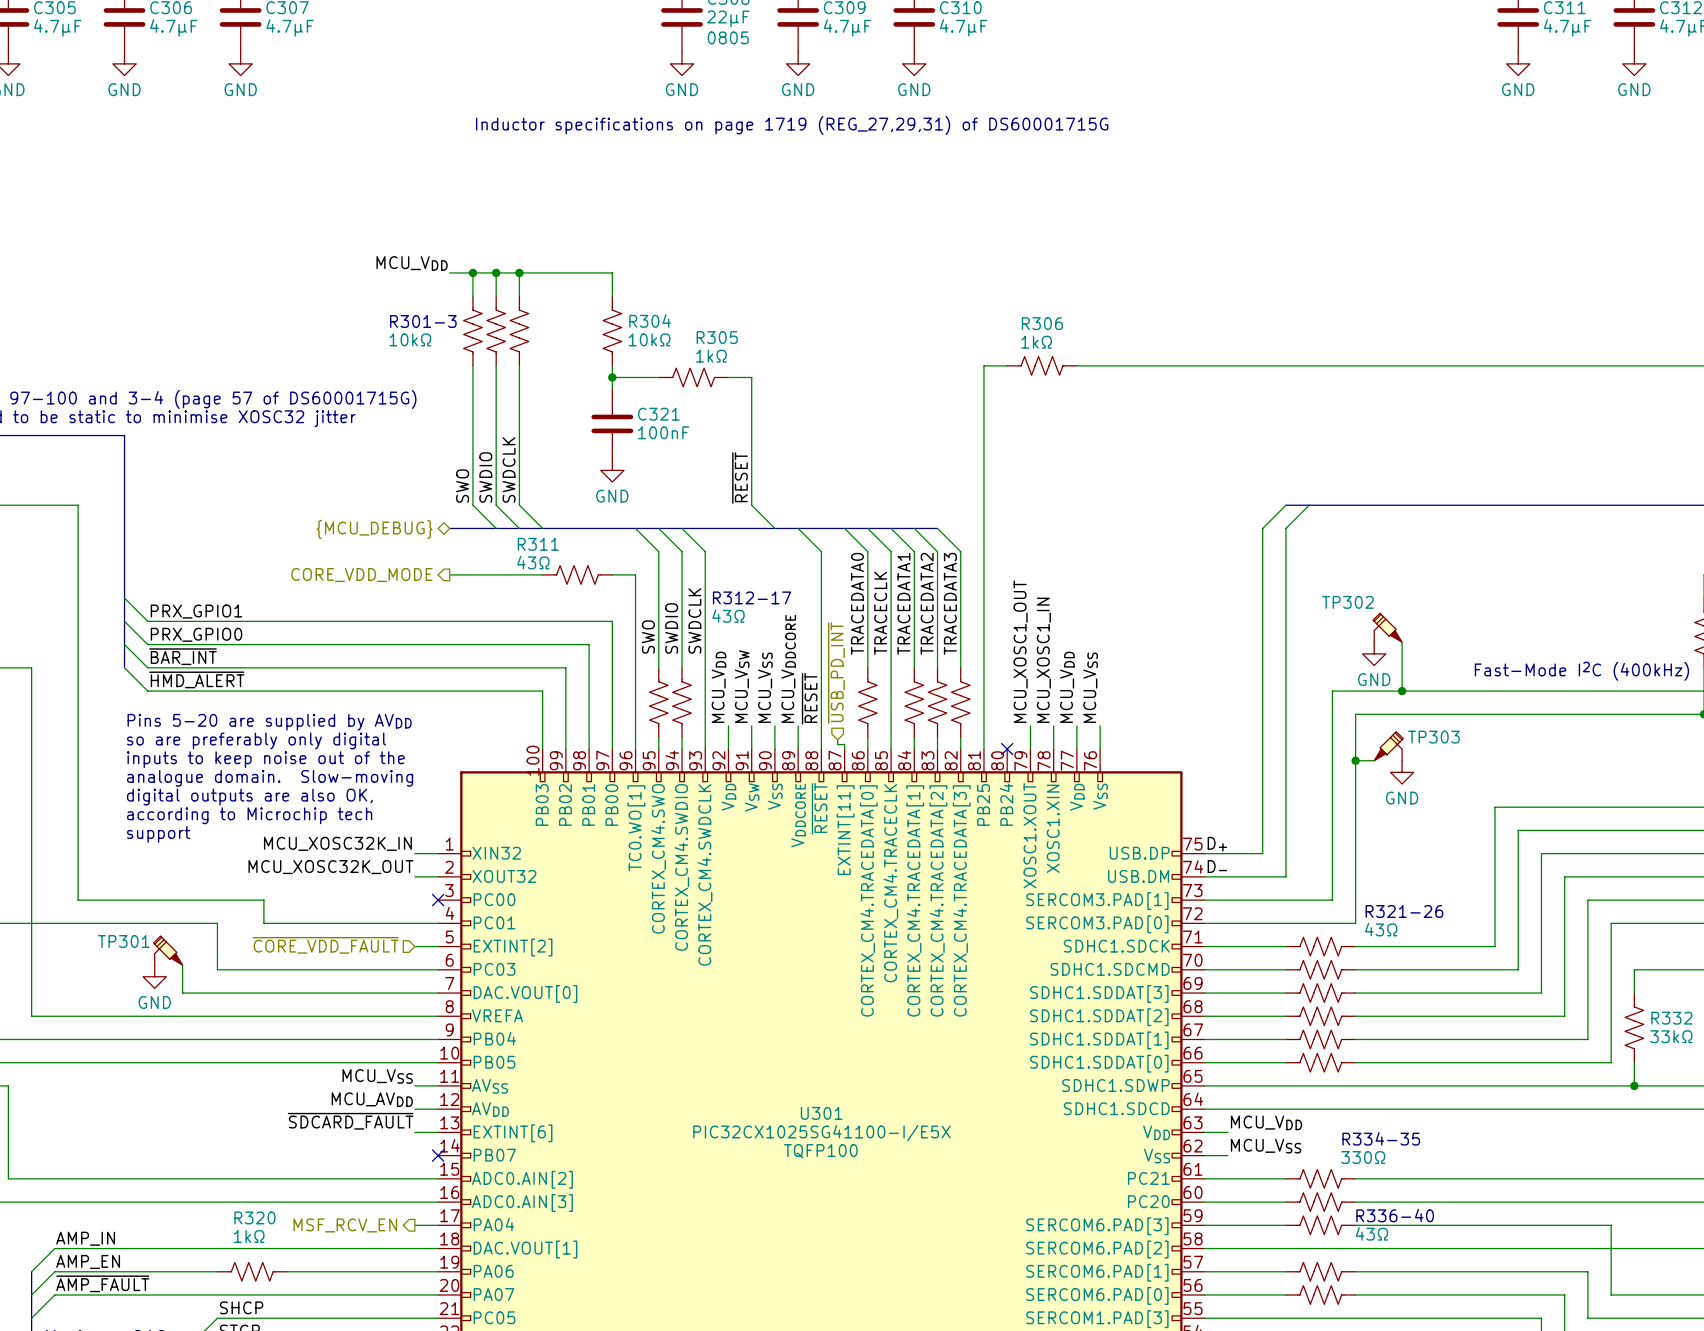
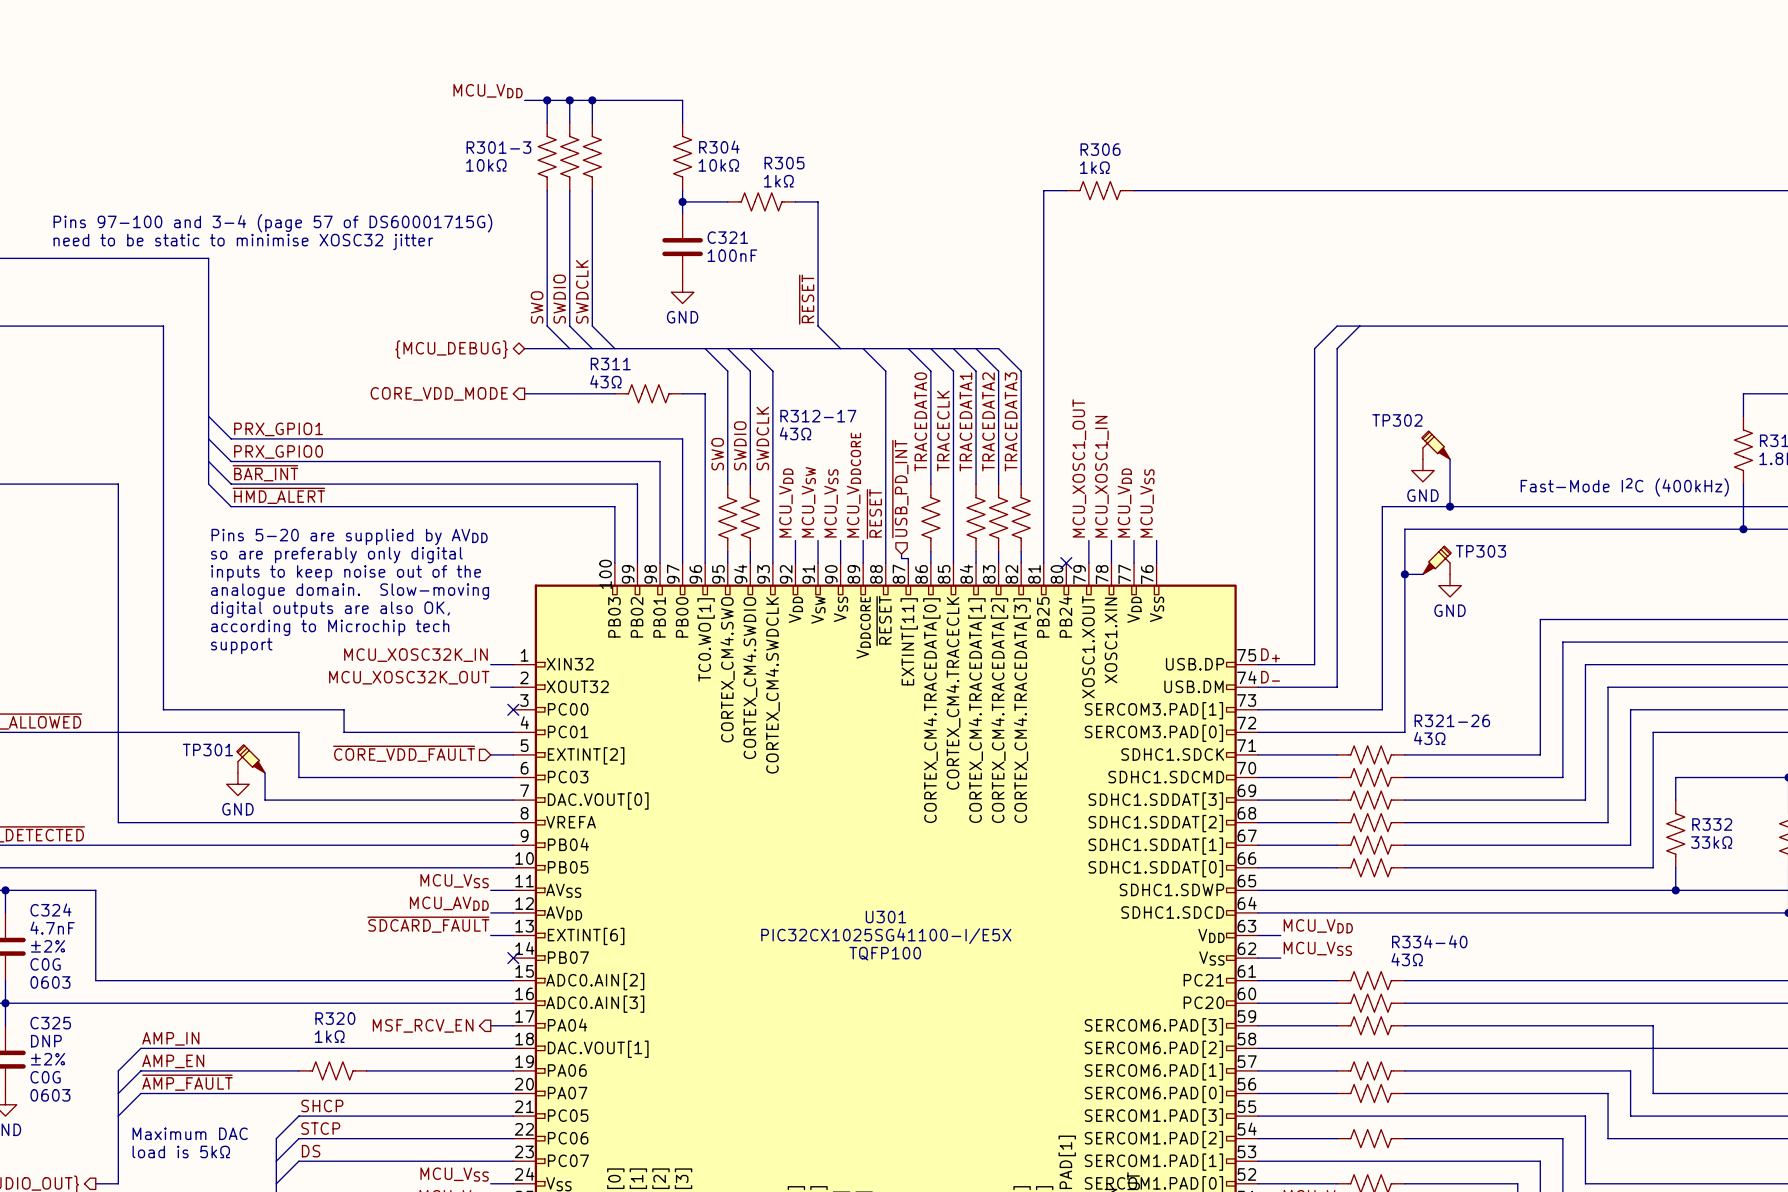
text: R334-35 (1381, 1138) -> R334-40 (1429, 941)
part value: 330Ω (1363, 1157) -> 43Ω (1407, 959)
text: R336-40 (1395, 1215) -> none
part value: 43Ω (1371, 1233) -> none

